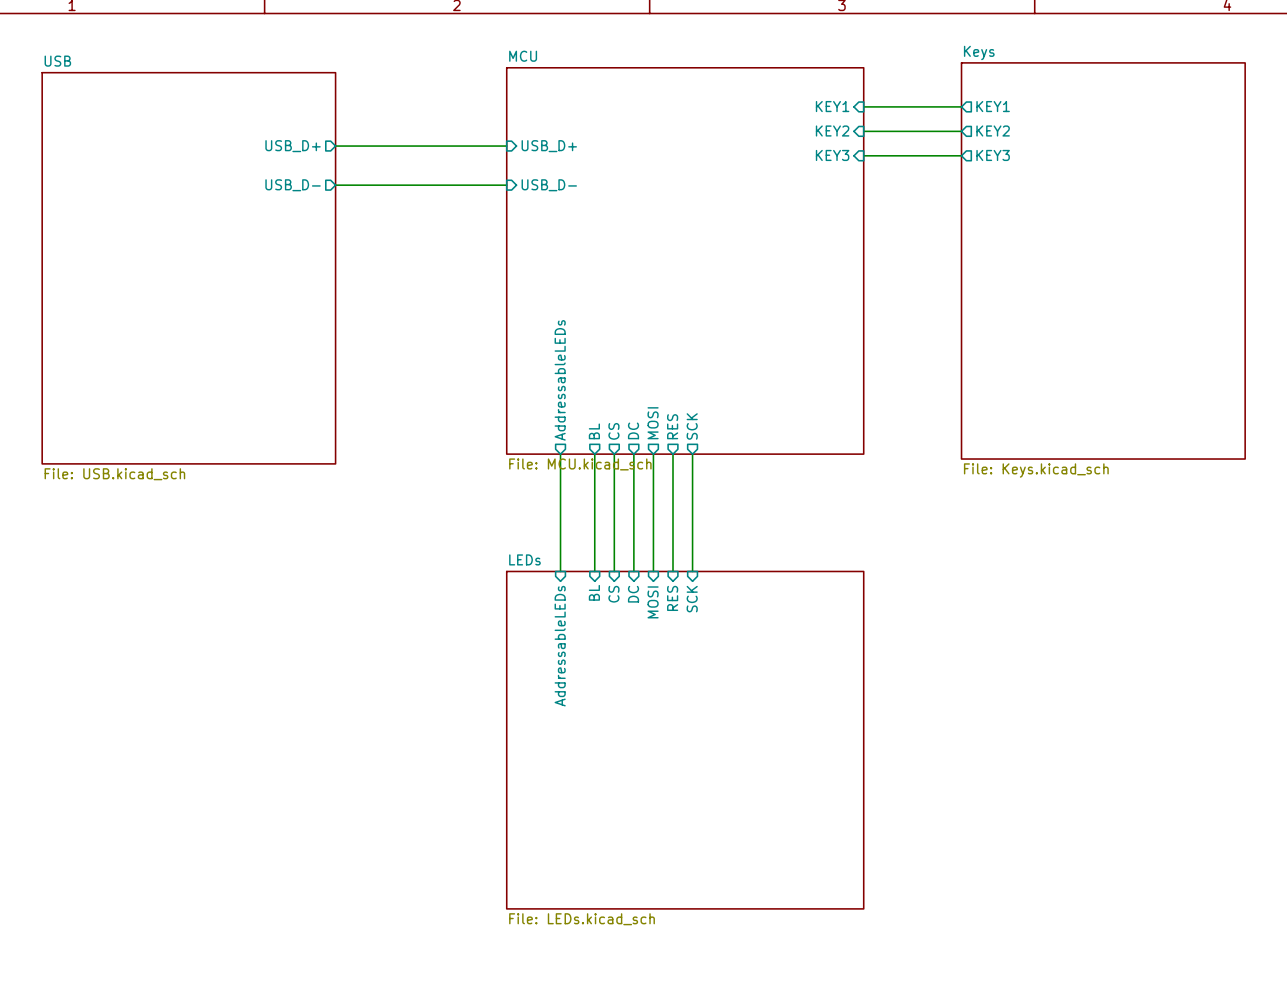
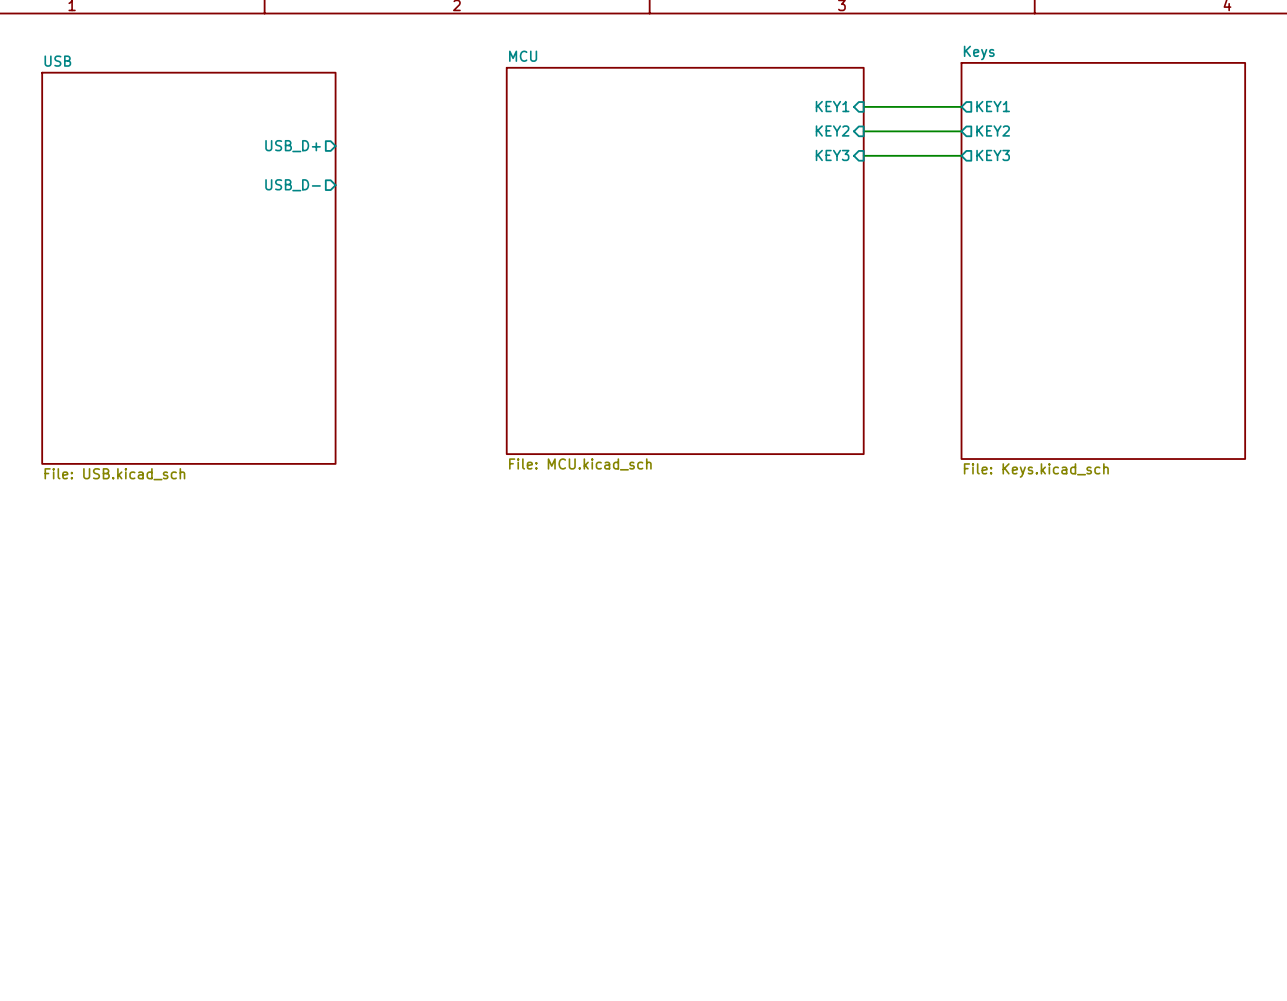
wire: (335, 146) (506, 146) -> none
sheet pin: USB_D+ (549, 146) -> none
wire: (335, 185) (506, 185) -> none
sheet pin: USB_D- (549, 185) -> none
sheet pin: AddressableLEDs (560, 380) -> none
sheet pin: MOSI (653, 423) -> none
sheet pin: RES (672, 426) -> none
sheet pin: SCK (692, 426) -> none
sheet pin: DC (633, 430) -> none
sheet pin: BL (594, 431) -> none
sheet pin: CS (613, 431) -> none
wire: (560, 454) (560, 571) -> none
wire: (594, 454) (594, 571) -> none
wire: (614, 454) (614, 571) -> none
wire: (633, 454) (633, 571) -> none
wire: (653, 454) (653, 571) -> none
wire: (673, 454) (673, 571) -> none
wire: (692, 454) (692, 571) -> none
sheet pin: BL (594, 592) -> none
sheet pin: CS (613, 594) -> none
sheet pin: DC (633, 594) -> none
sheet pin: RES (672, 598) -> none
sheet pin: SCK (692, 599) -> none
sheet pin: MOSI (653, 602) -> none
sheet pin: AddressableLEDs (560, 646) -> none
sheet LEDs: File: LEDs.kicad_sch (685, 740) -> none

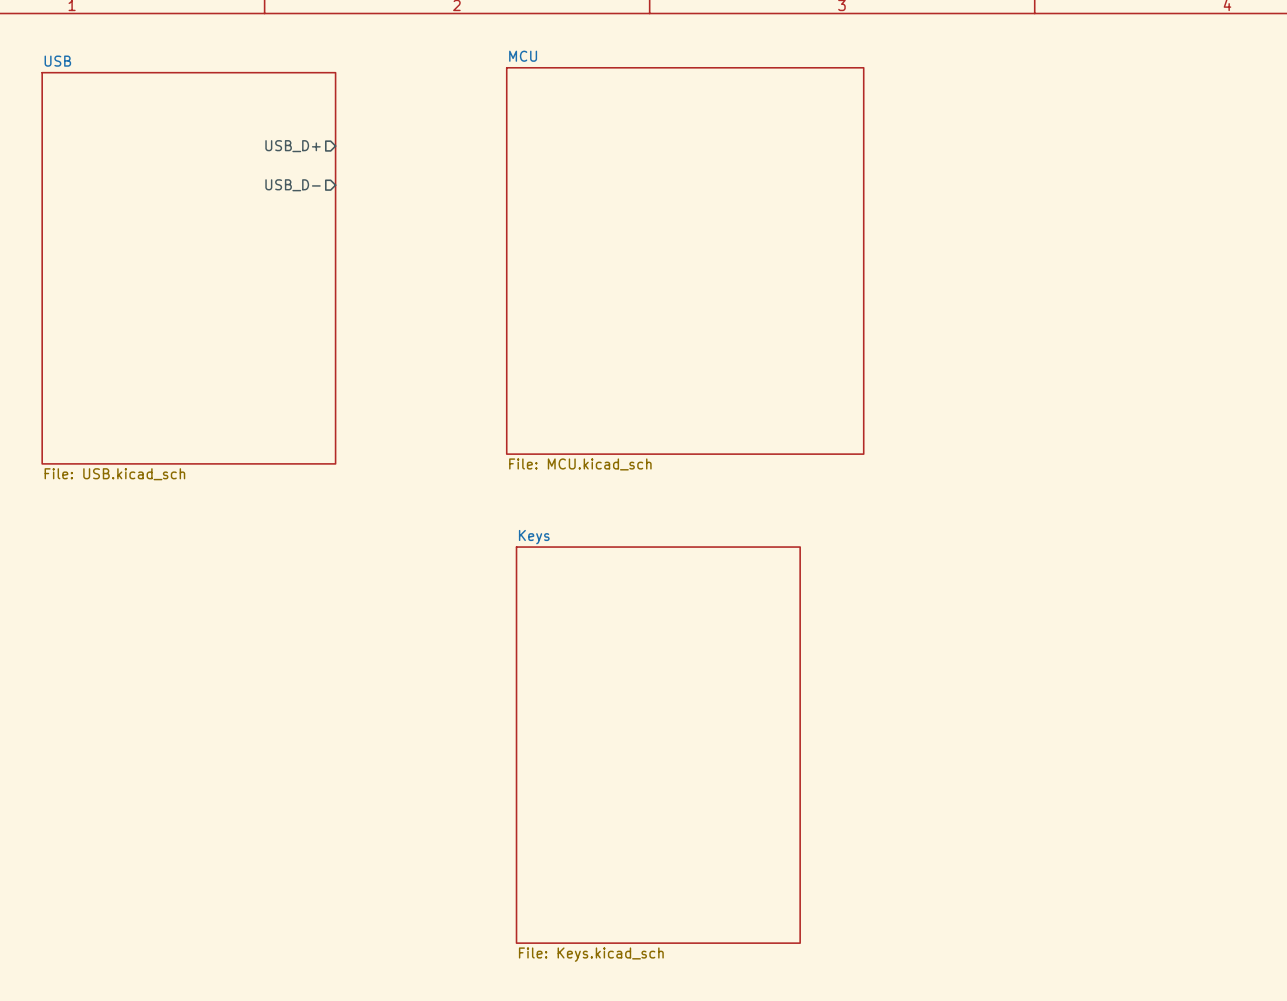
sheet pin: KEY1 (832, 106) -> none
wire: (863, 106) (961, 106) -> none
sheet pin: KEY1 (993, 106) -> none
sheet pin: KEY2 (832, 131) -> none
wire: (863, 131) (961, 131) -> none
sheet pin: KEY2 (993, 131) -> none
sheet pin: KEY3 (832, 155) -> none
wire: (863, 155) (961, 155) -> none
sheet pin: KEY3 (993, 155) -> none
sheet Keys: File: Keys.kicad_sch (1103, 260) -> none
sheet Keys: none -> File: Keys.kicad_sch (658, 745)

